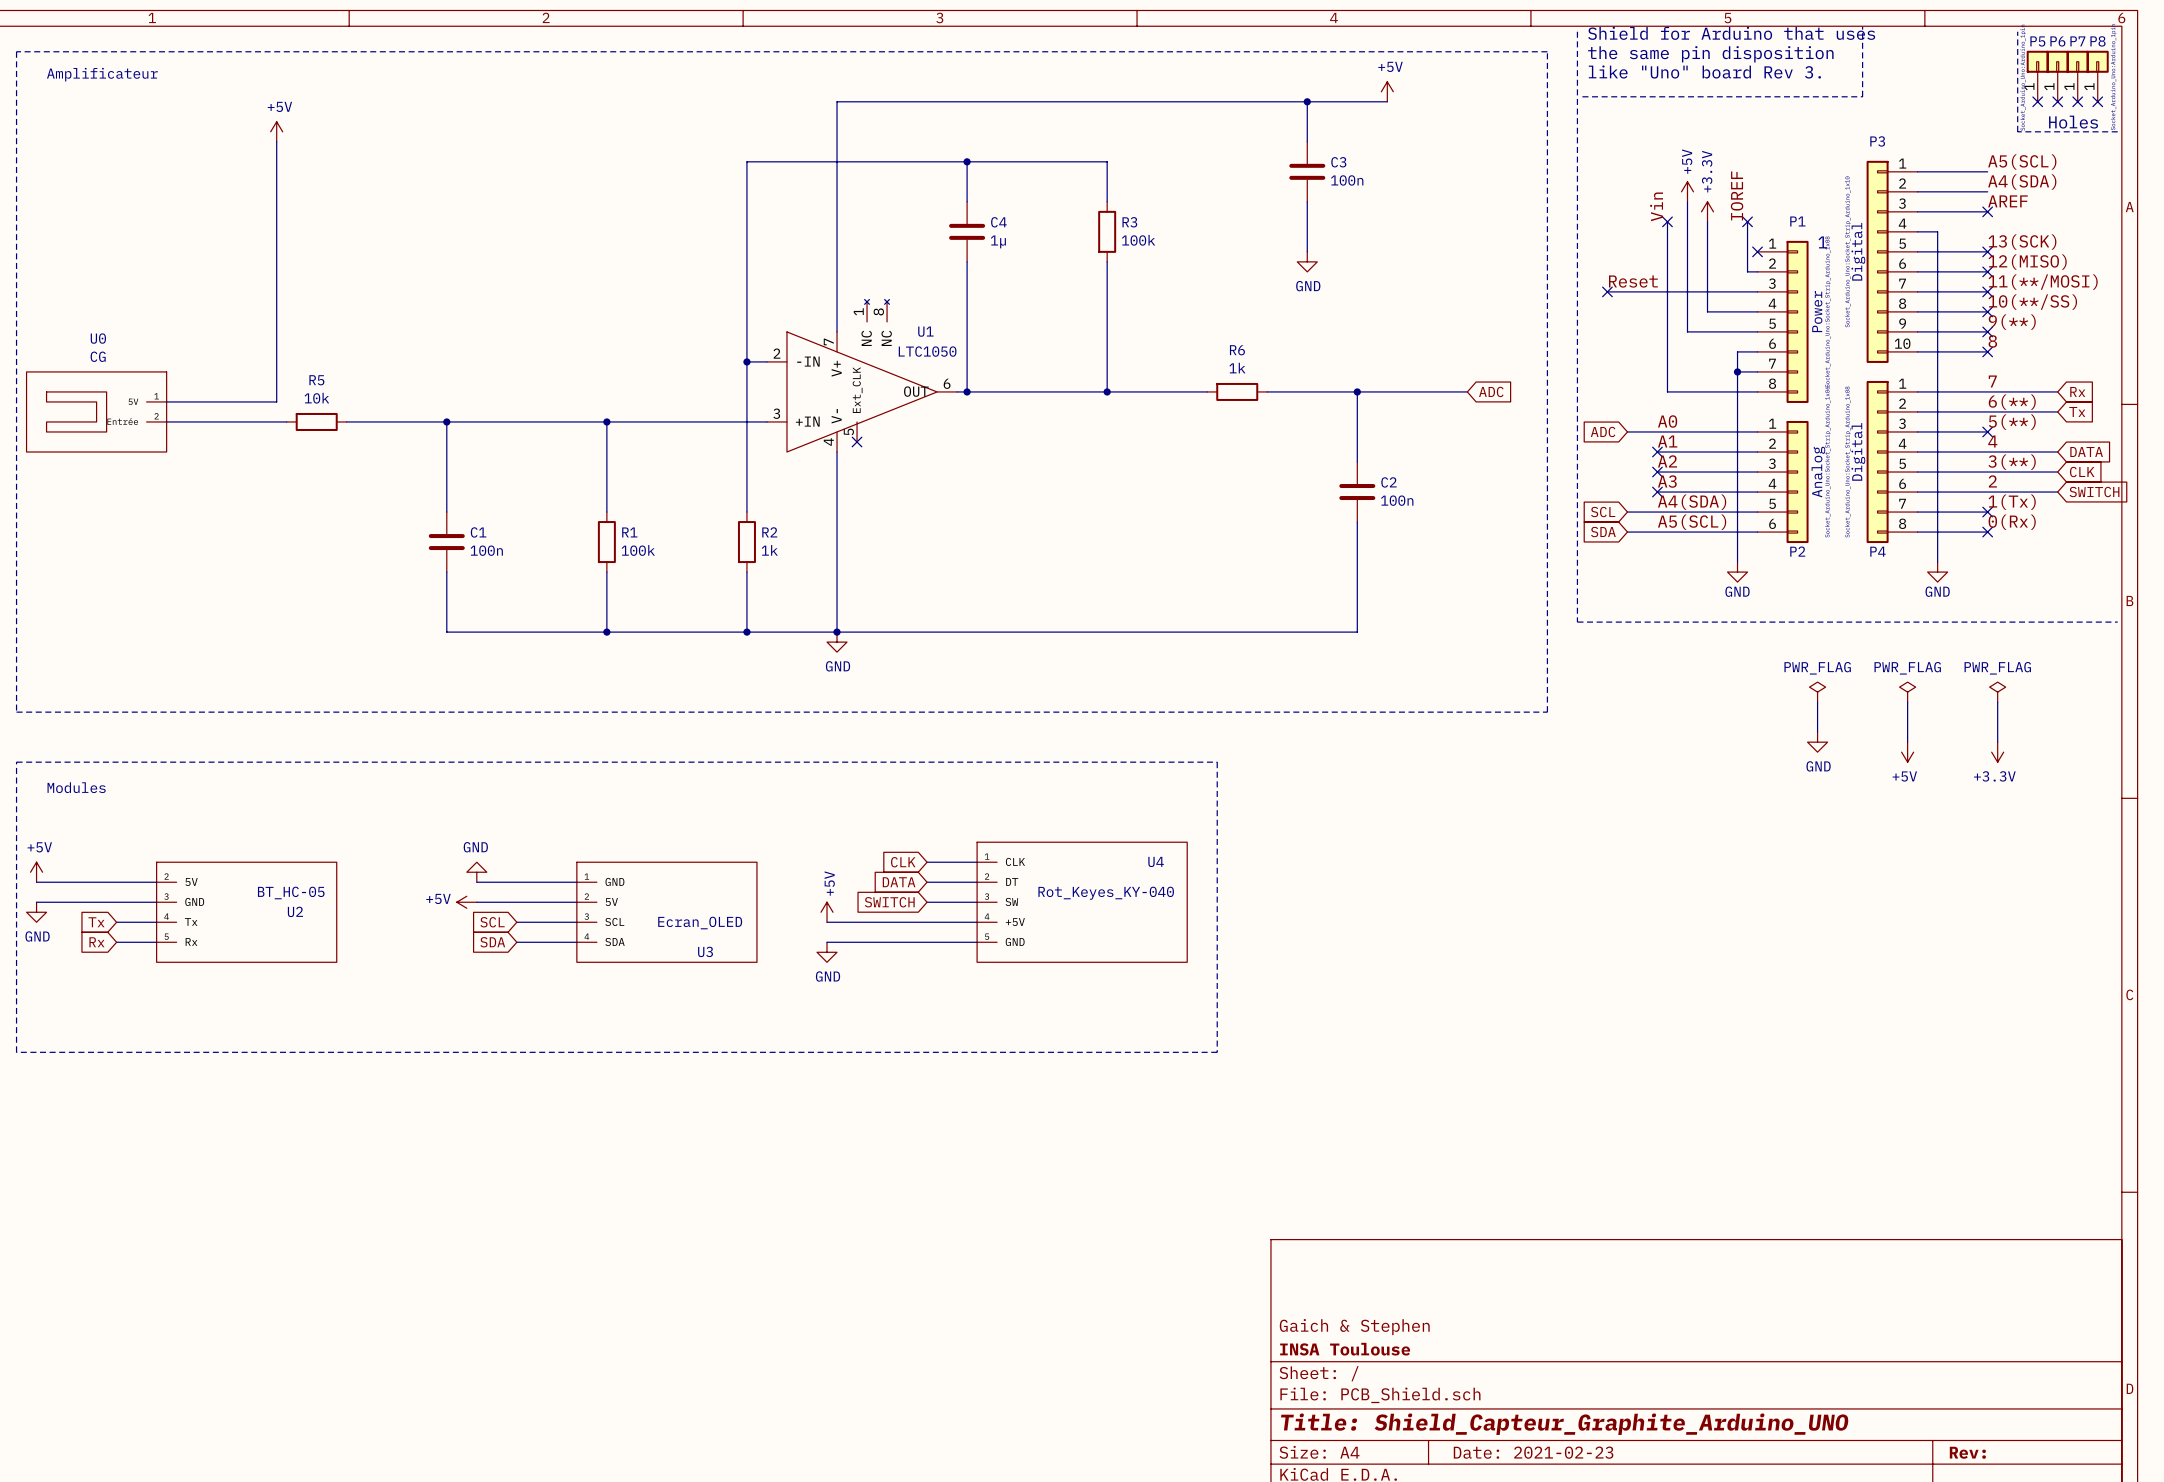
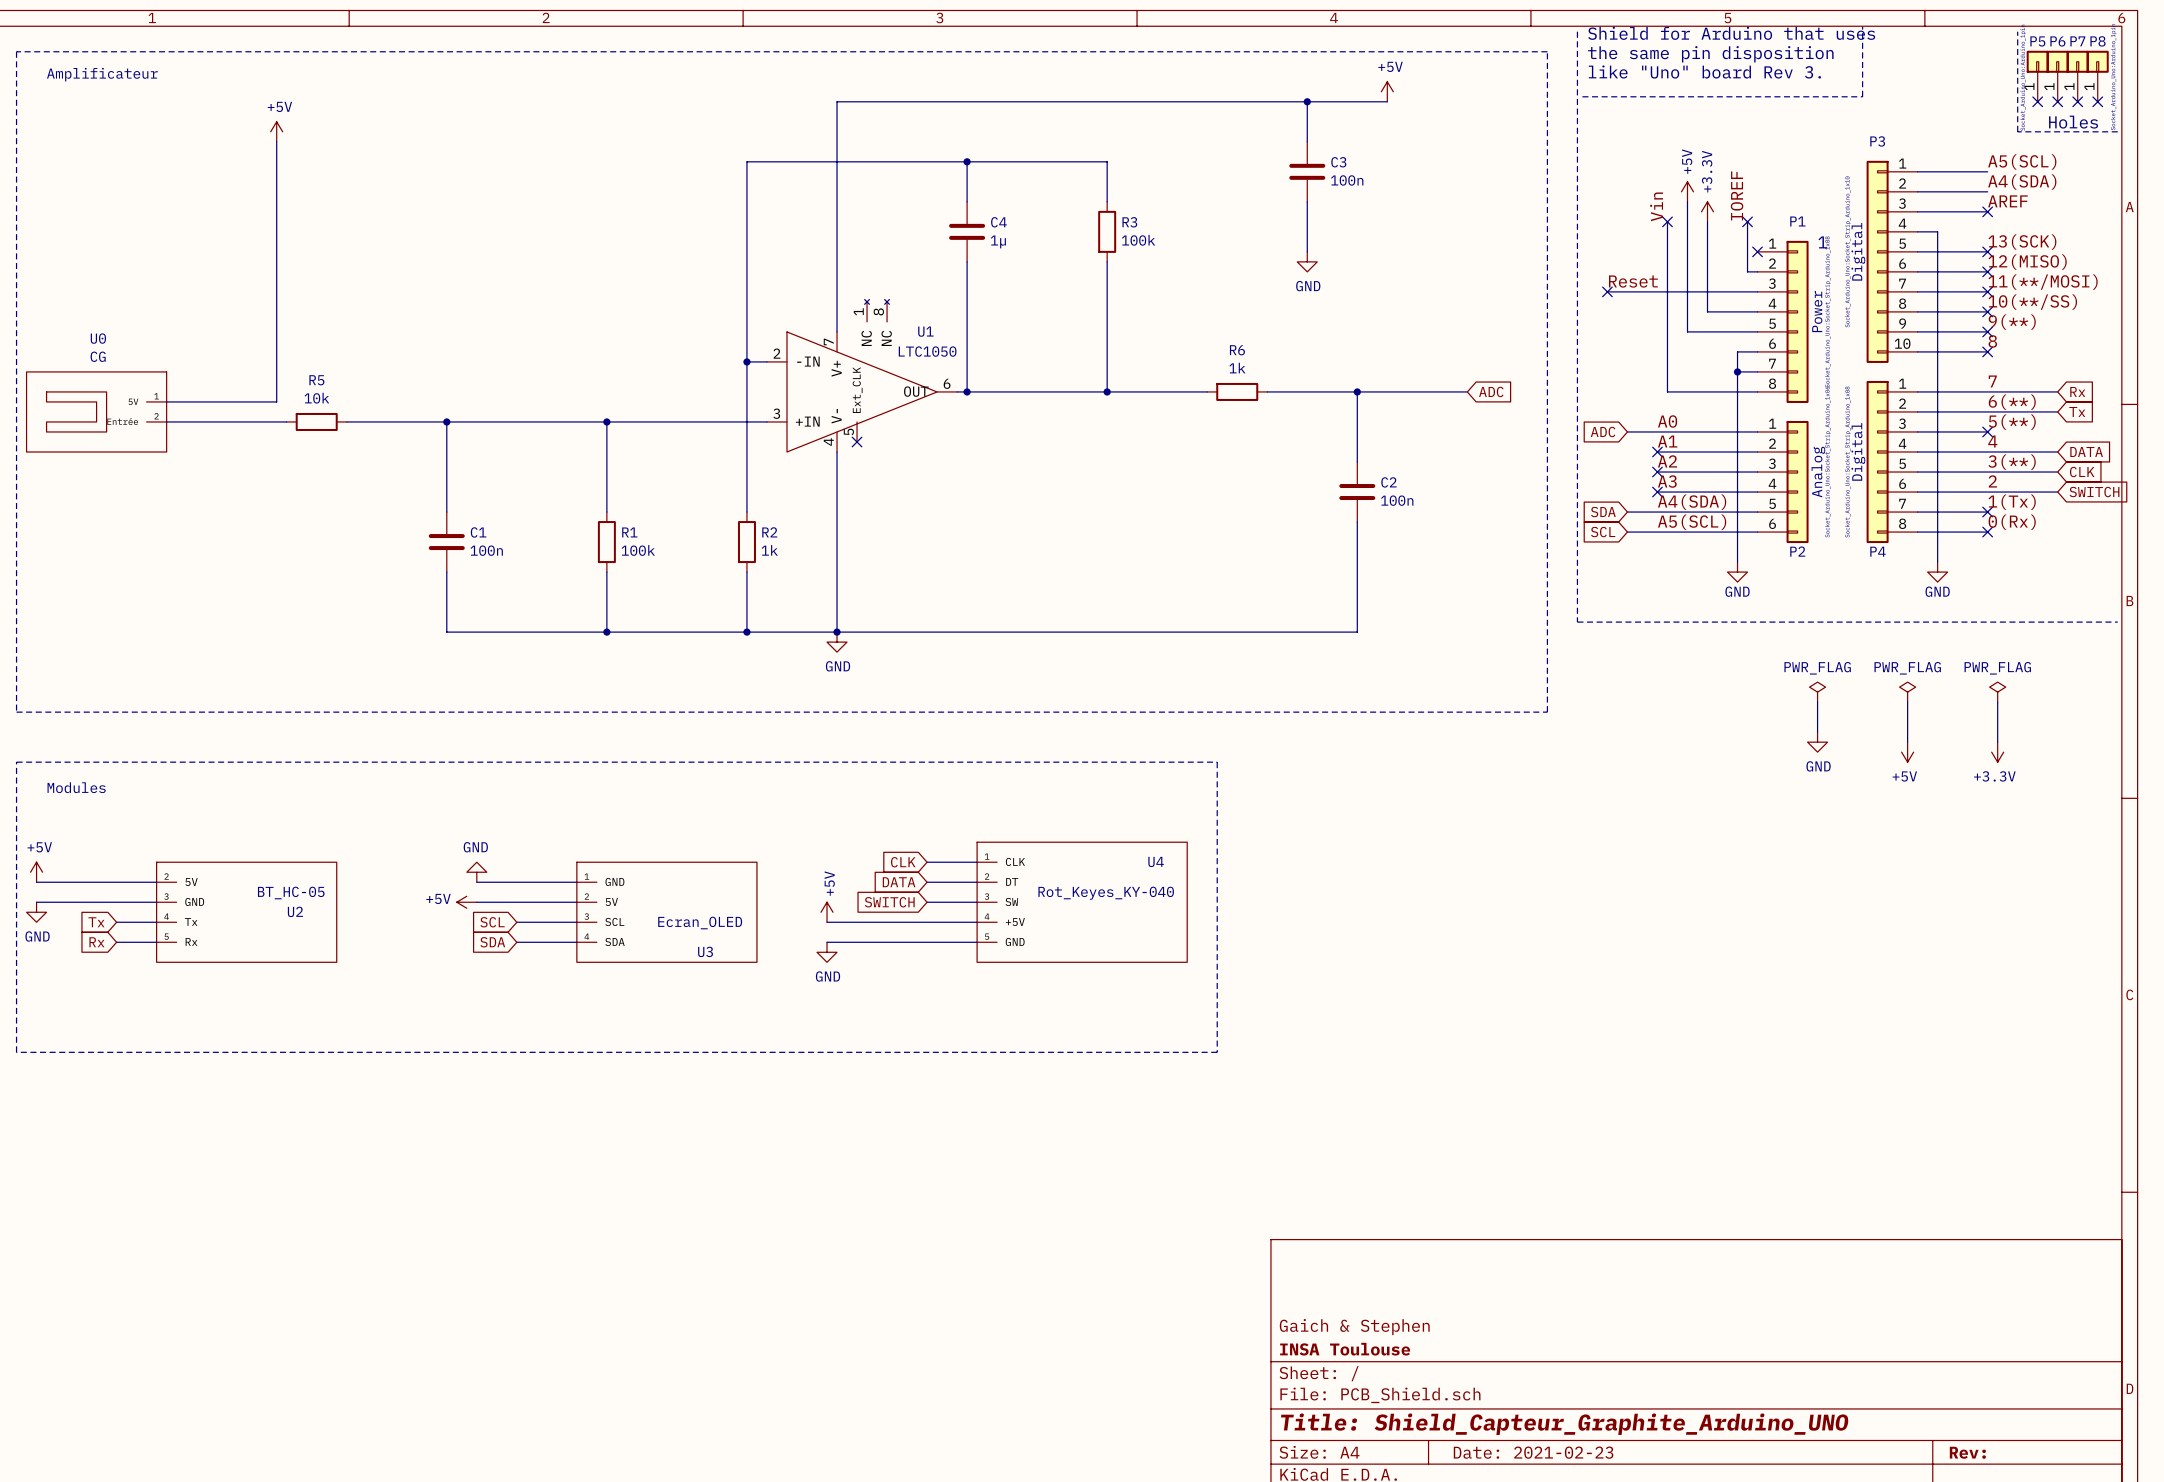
global label: SCL (1603, 512) -> SDA (1603, 512)
global label: SDA (1603, 532) -> SCL (1603, 532)

